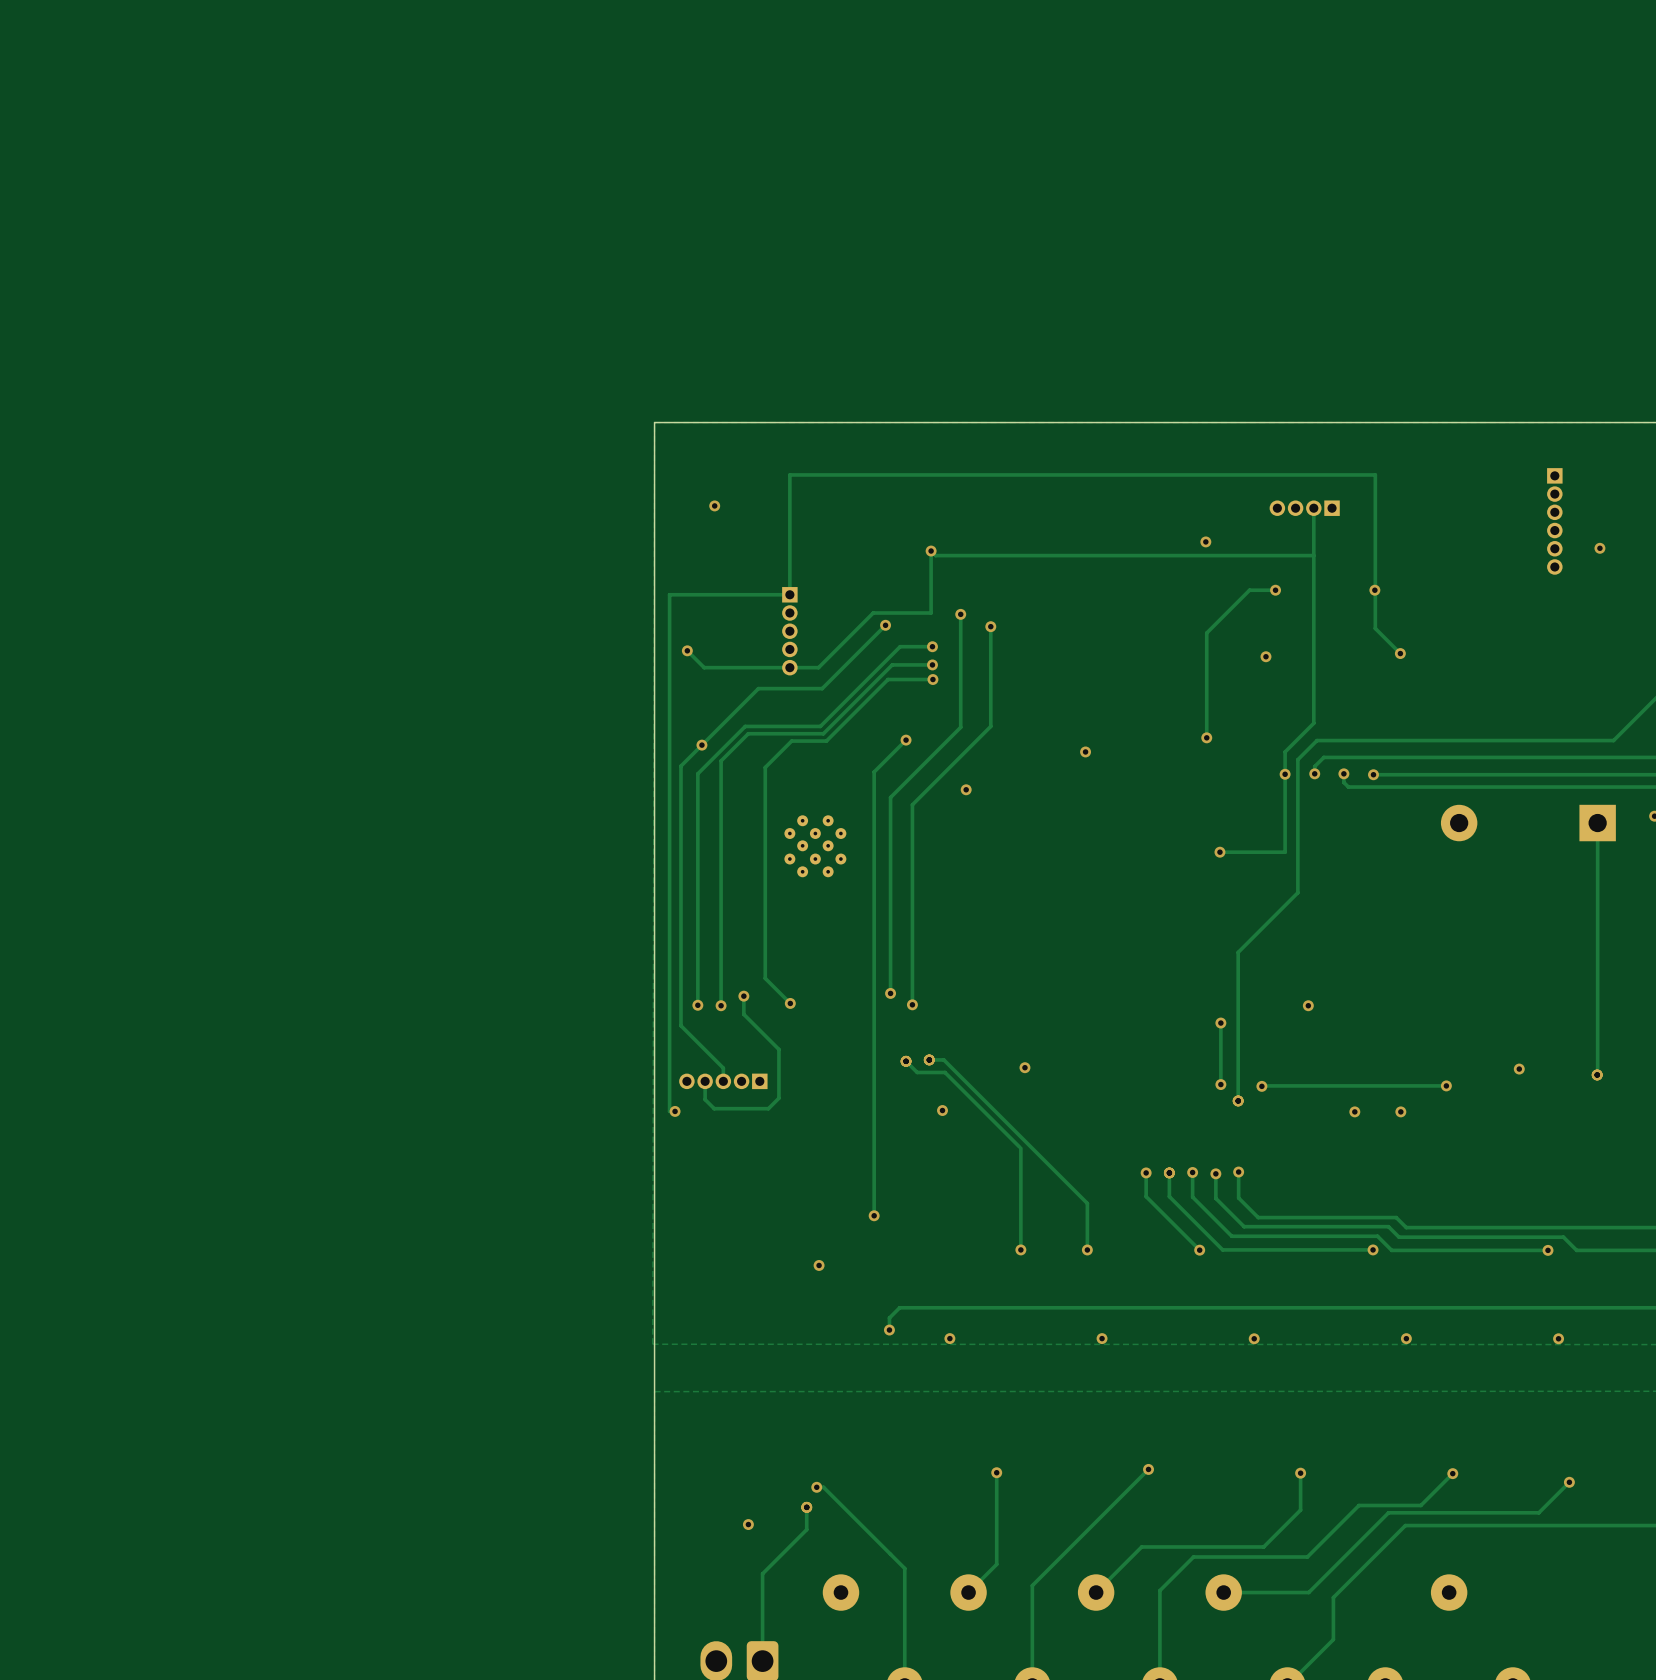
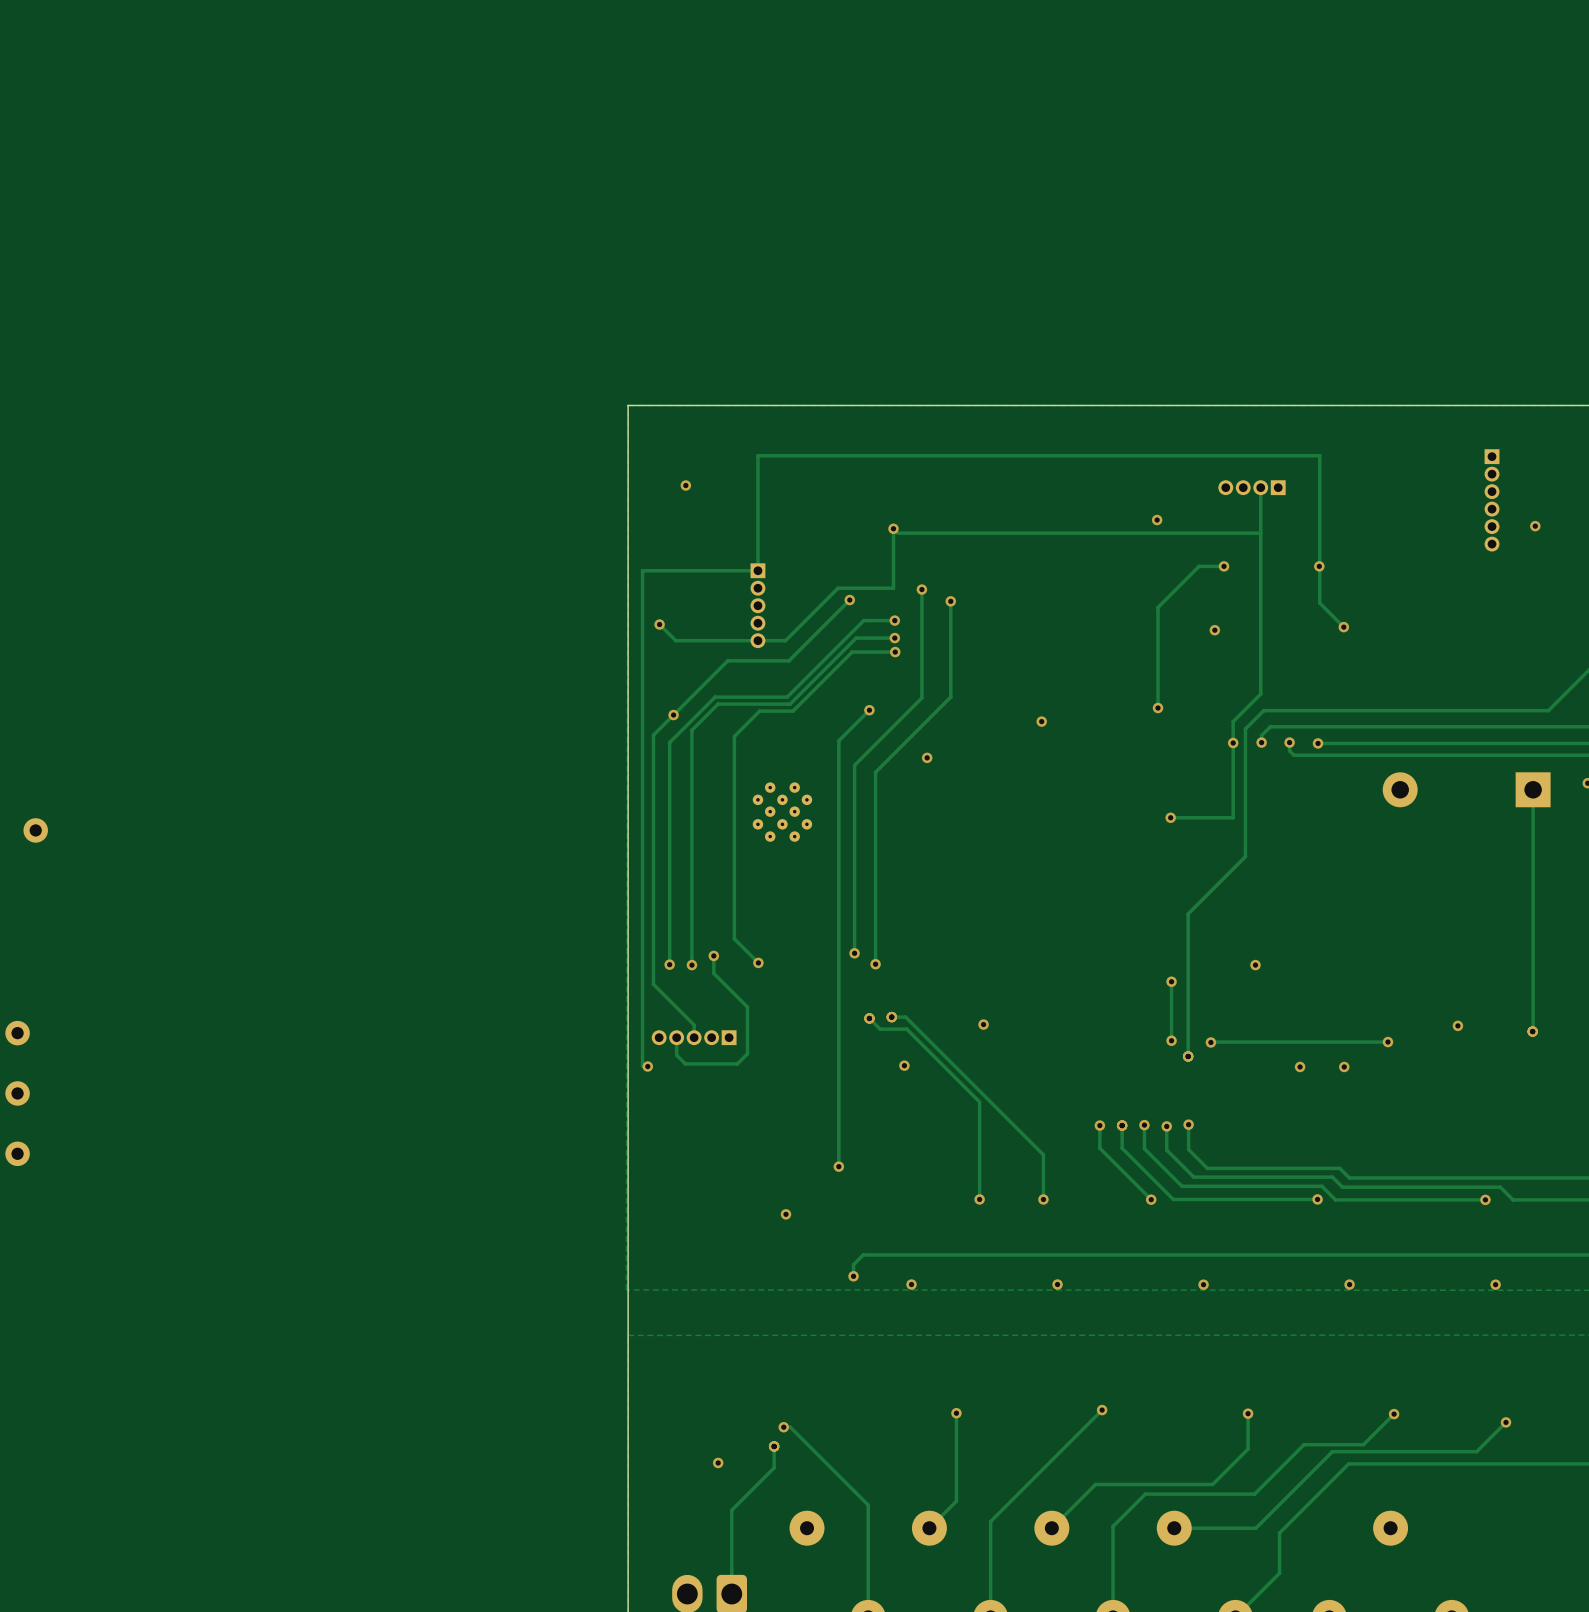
part: none -> (35, 830)
part: none -> (17, 1033)
part: none -> (17, 1093)
part: none -> (17, 1153)

